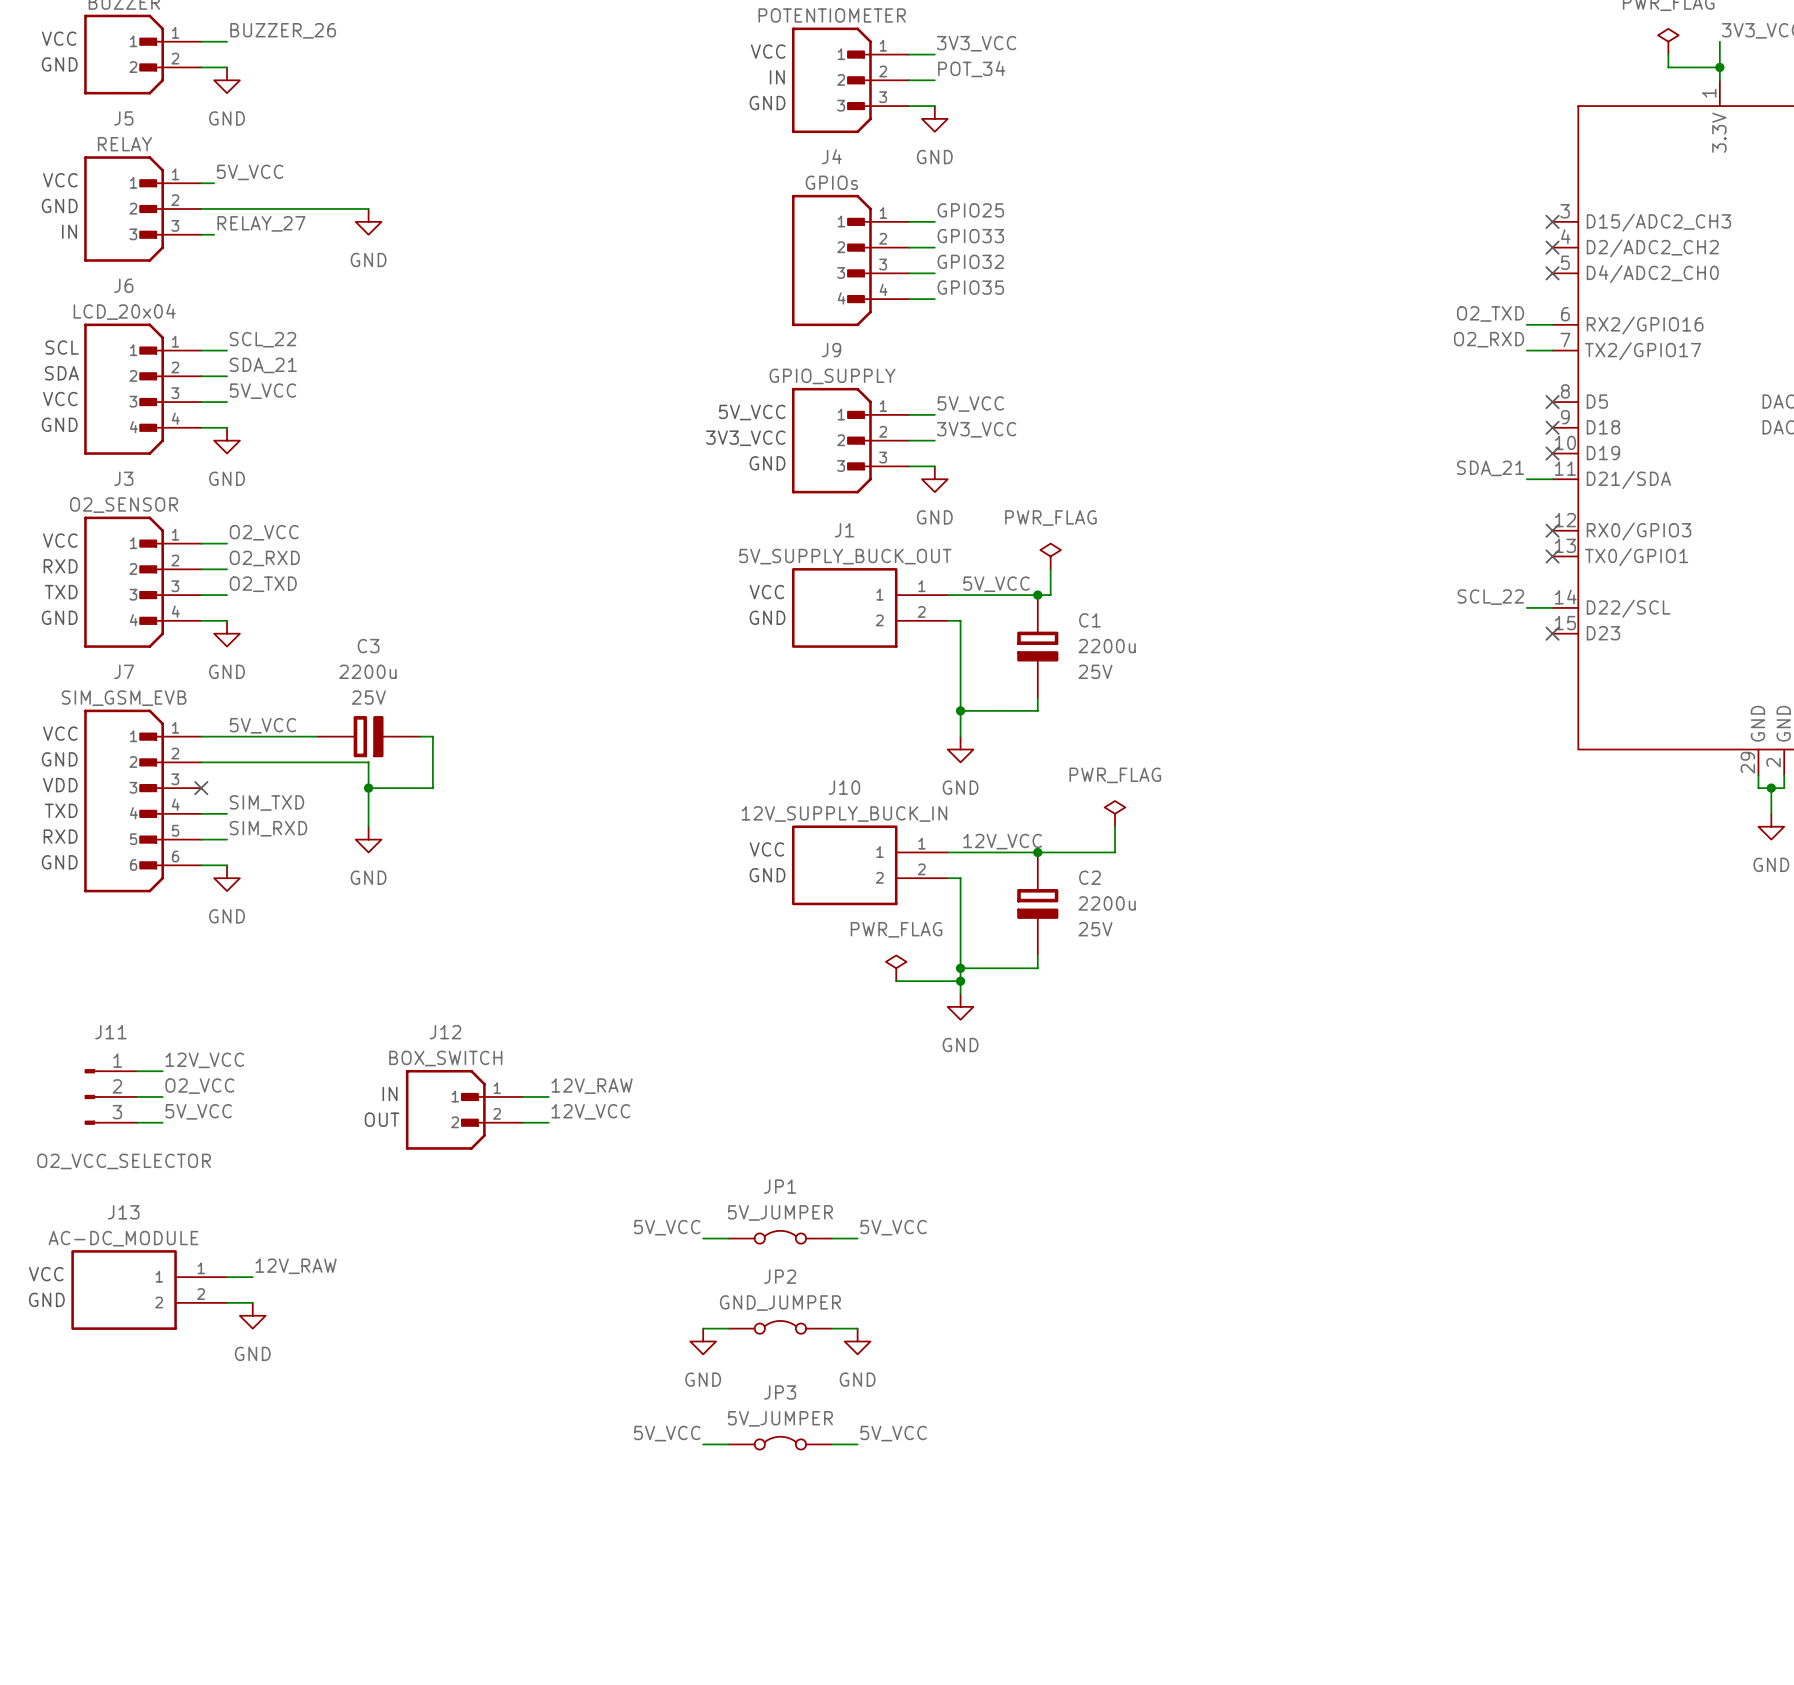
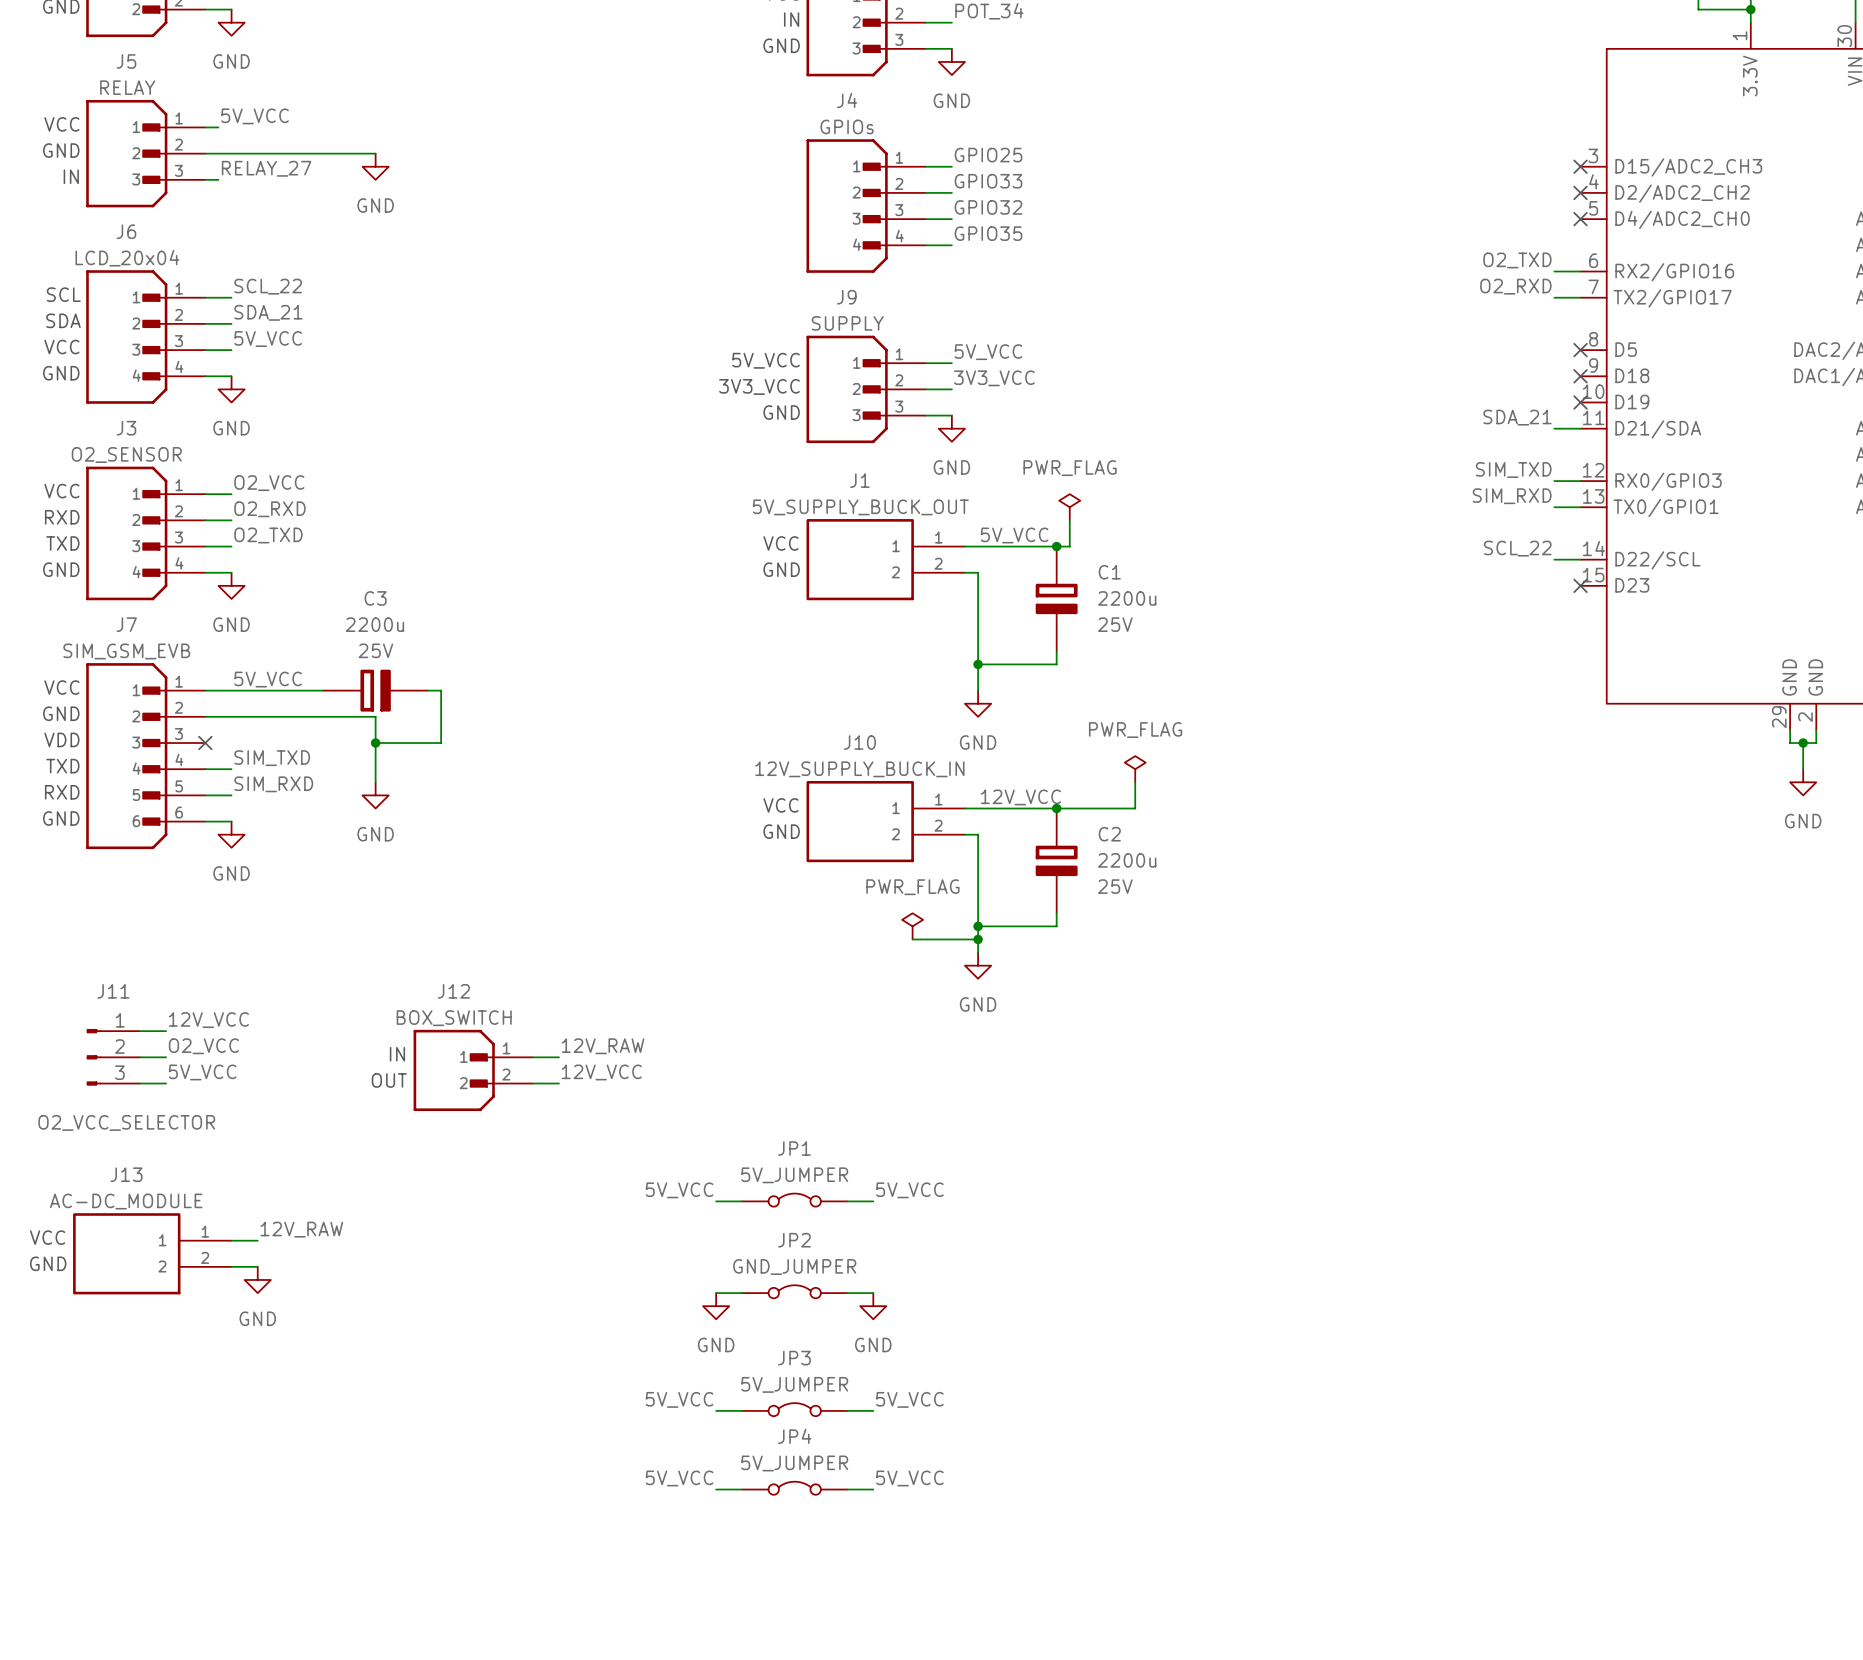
J9 value: GPIO_SUPPLY (832, 376) -> SUPPLY (847, 323)
label: none -> SIM_TXD (1513, 470)
wire: none -> (1554, 481) (1580, 481)
no-connect mark: (1552, 530) -> none
label: none -> SIM_RXD (1512, 496)
wire: none -> (1554, 507) (1580, 507)
no-connect mark: (1552, 556) -> none
label: none -> 5V_VCC (679, 1478)
label: none -> 5V_VCC (909, 1478)
JP4: none -> 5V_JUMPER (794, 1488)
wire: none -> (716, 1489) (742, 1489)
wire: none -> (847, 1489) (873, 1489)

